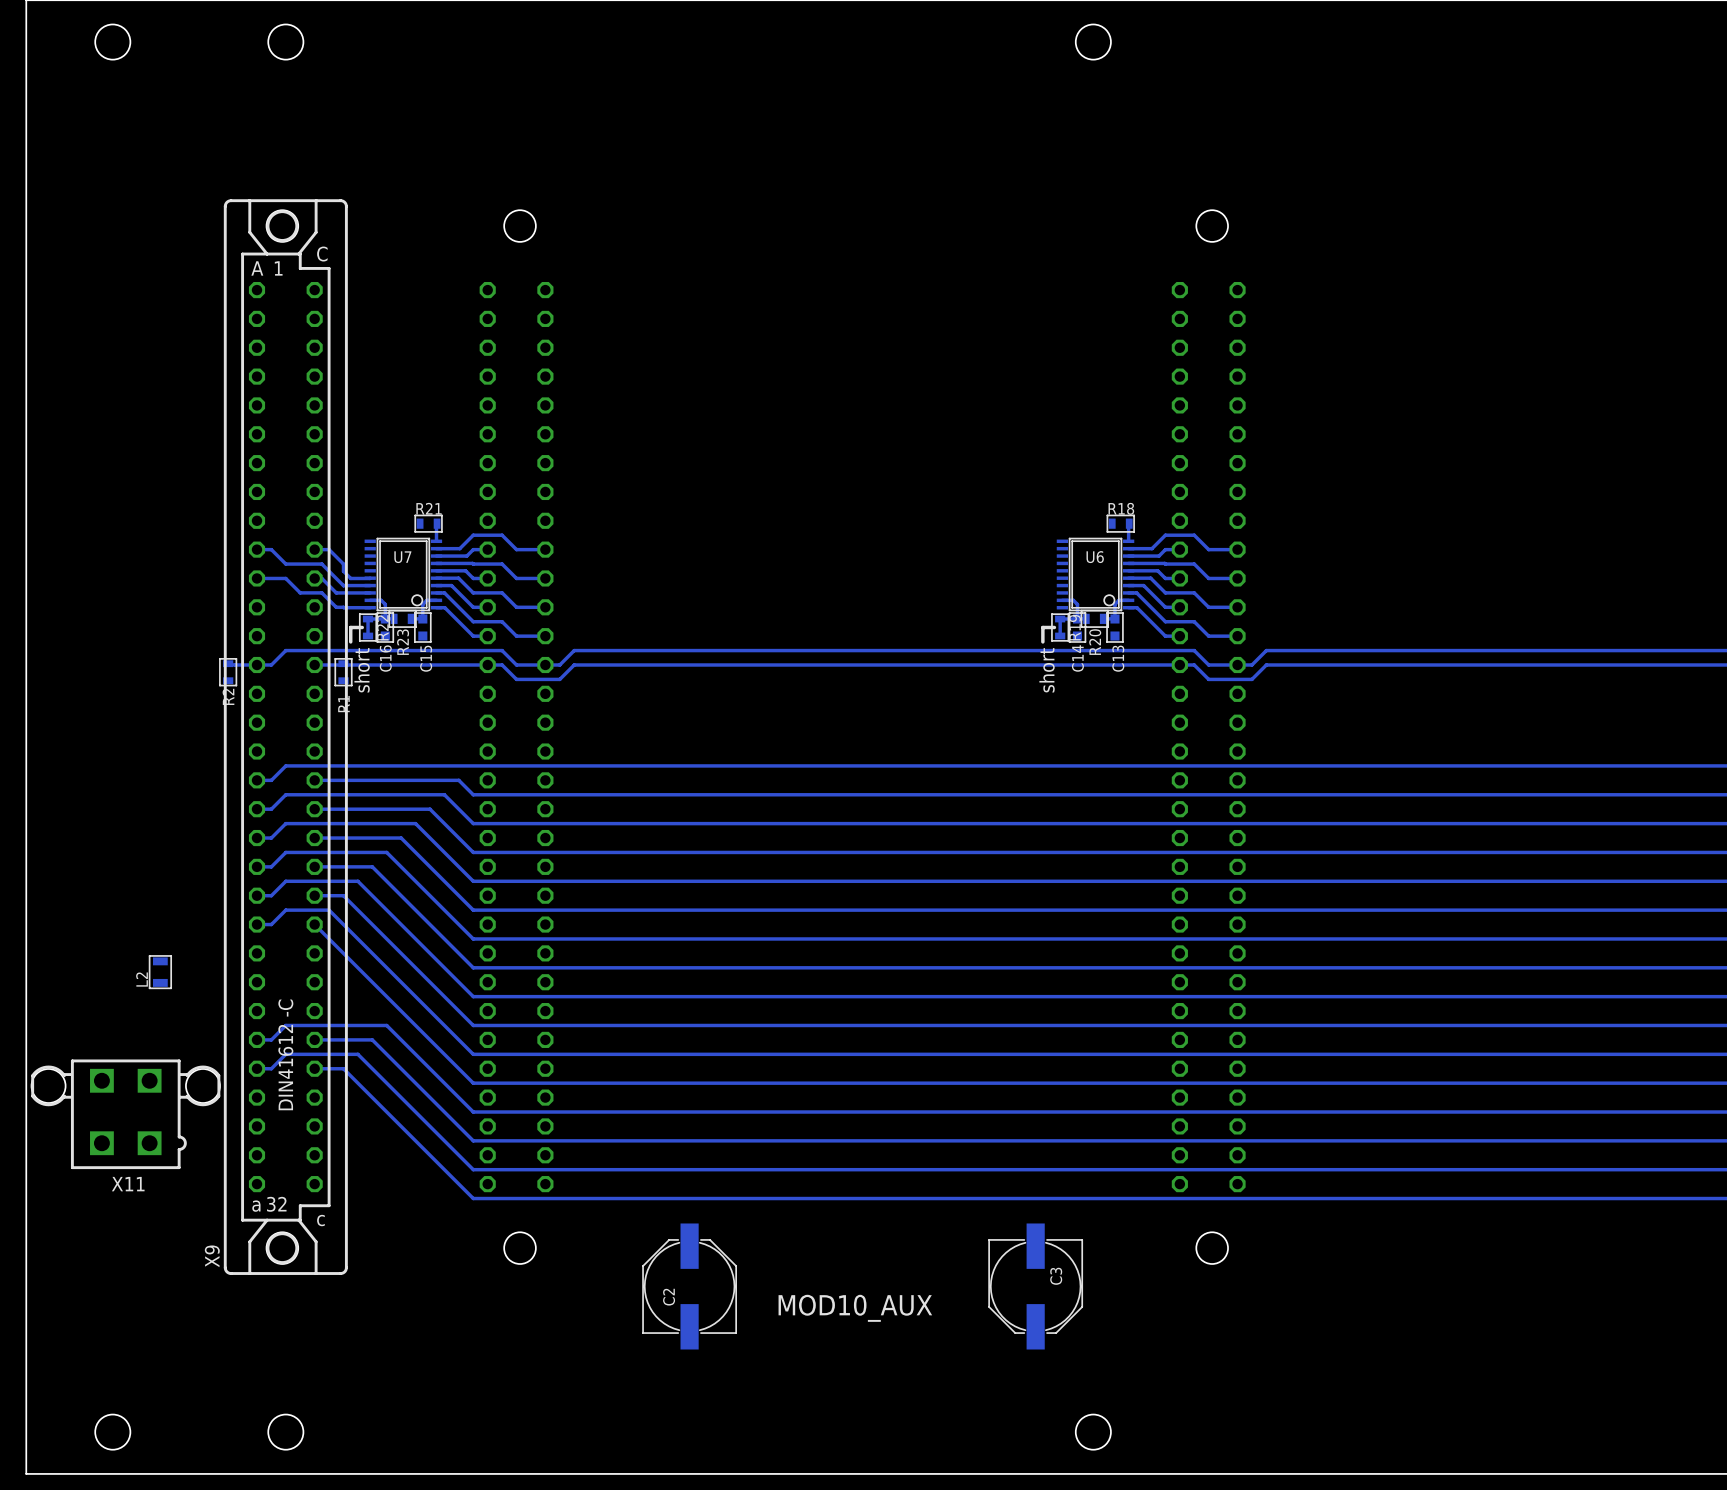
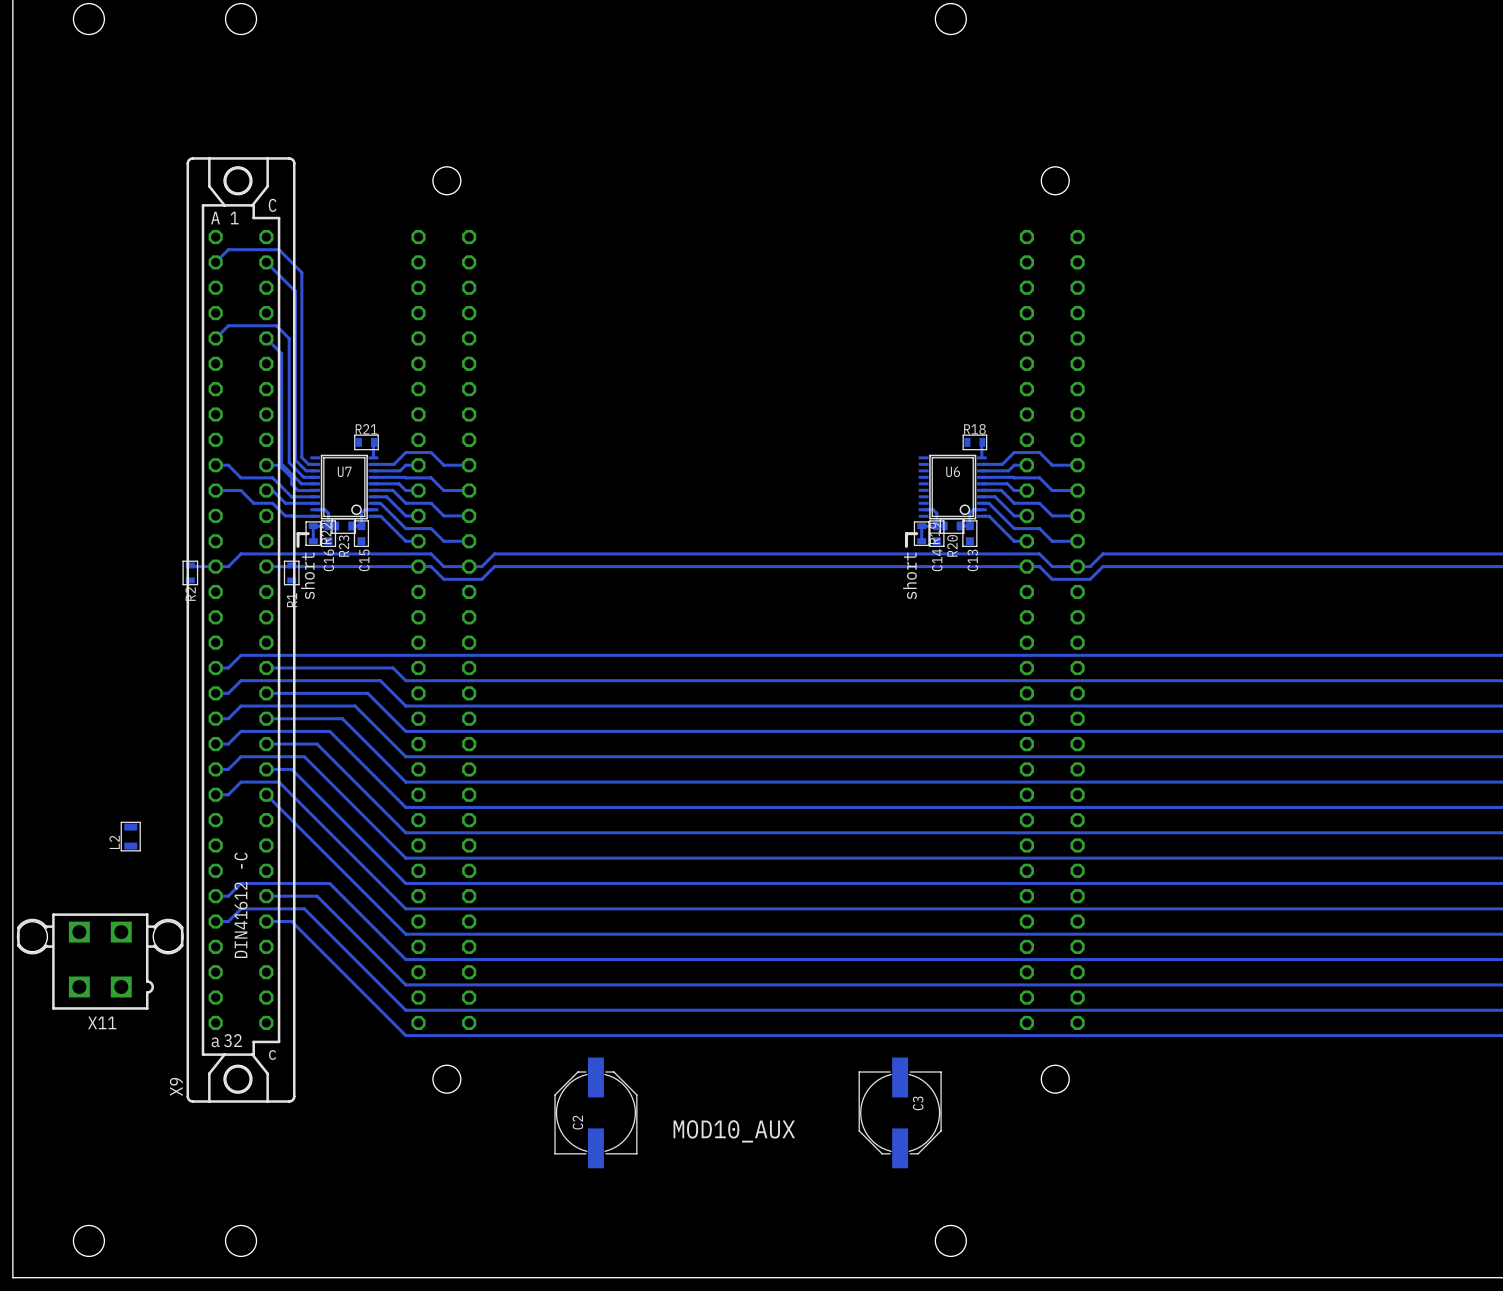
track: none -> (215, 262) (228, 249) (279, 249) (301, 272) (301, 457) (308, 464) (315, 464)
track: none -> (266, 262) (295, 291) (295, 460) (306, 470) (315, 470)
track: none -> (215, 338) (228, 325) (276, 325) (289, 338) (289, 462) (303, 477) (315, 477)
track: none -> (266, 338) (281, 353) (281, 463) (301, 483) (315, 483)

